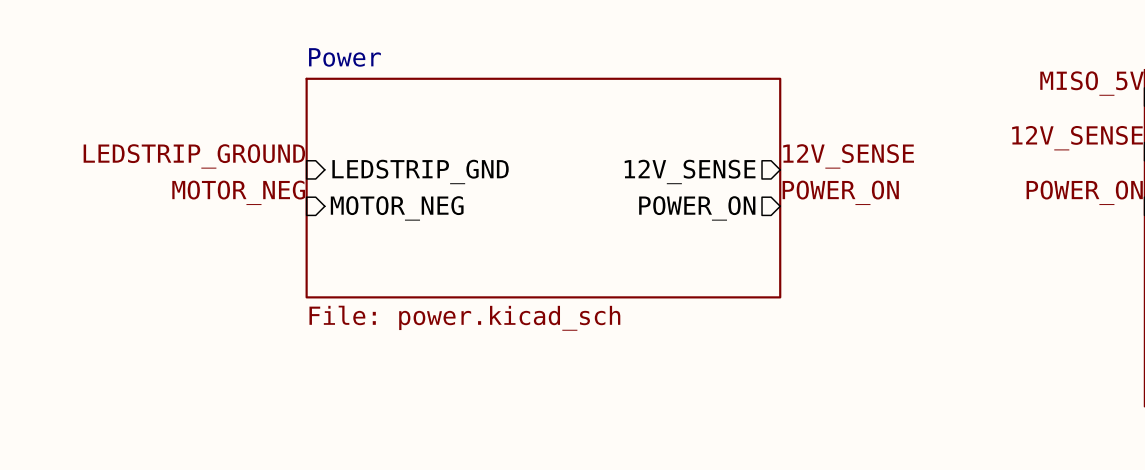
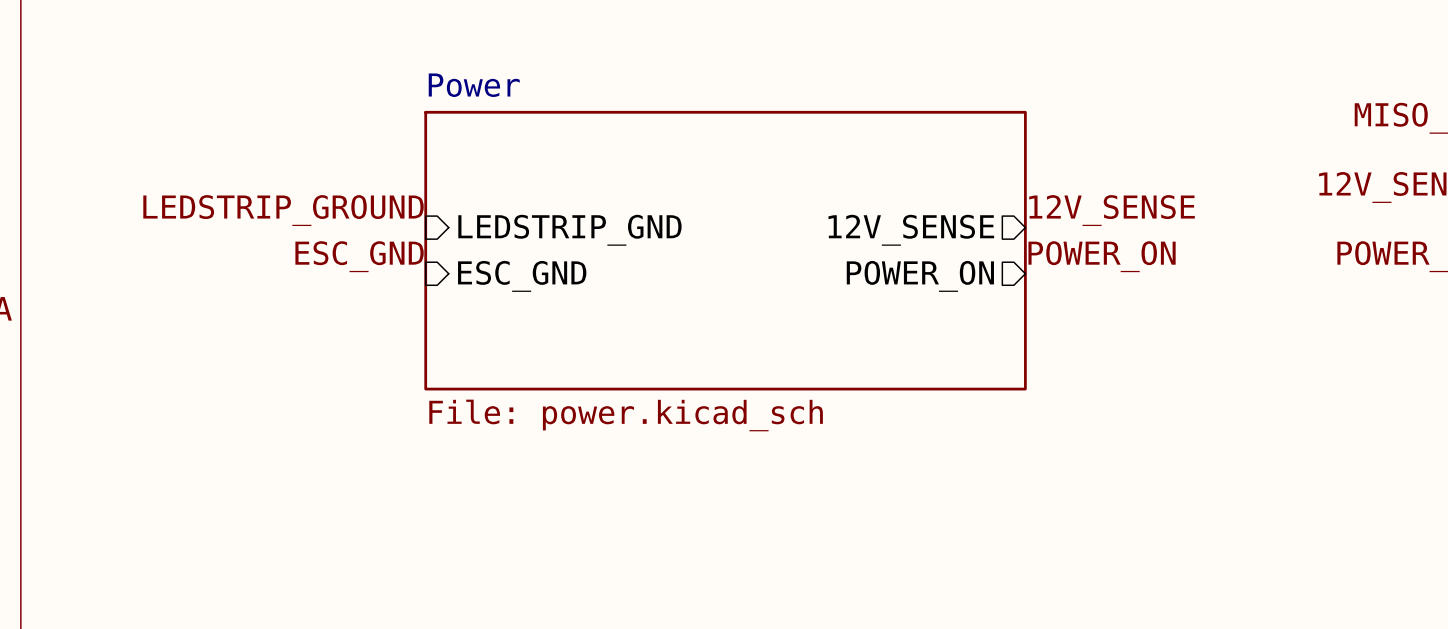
label: MOTOR_NEG (238, 192) -> ESC_GND (359, 256)
sheet pin: MOTOR_NEG (397, 208) -> ESC_GND (522, 276)

